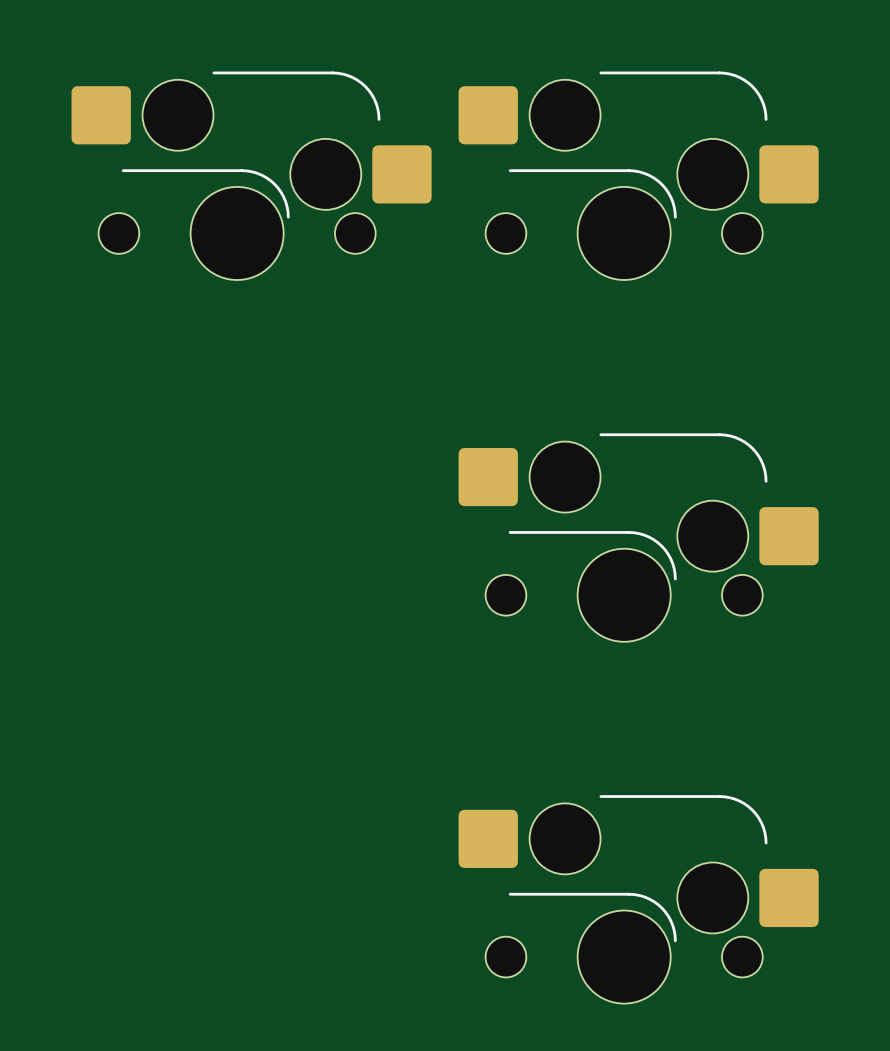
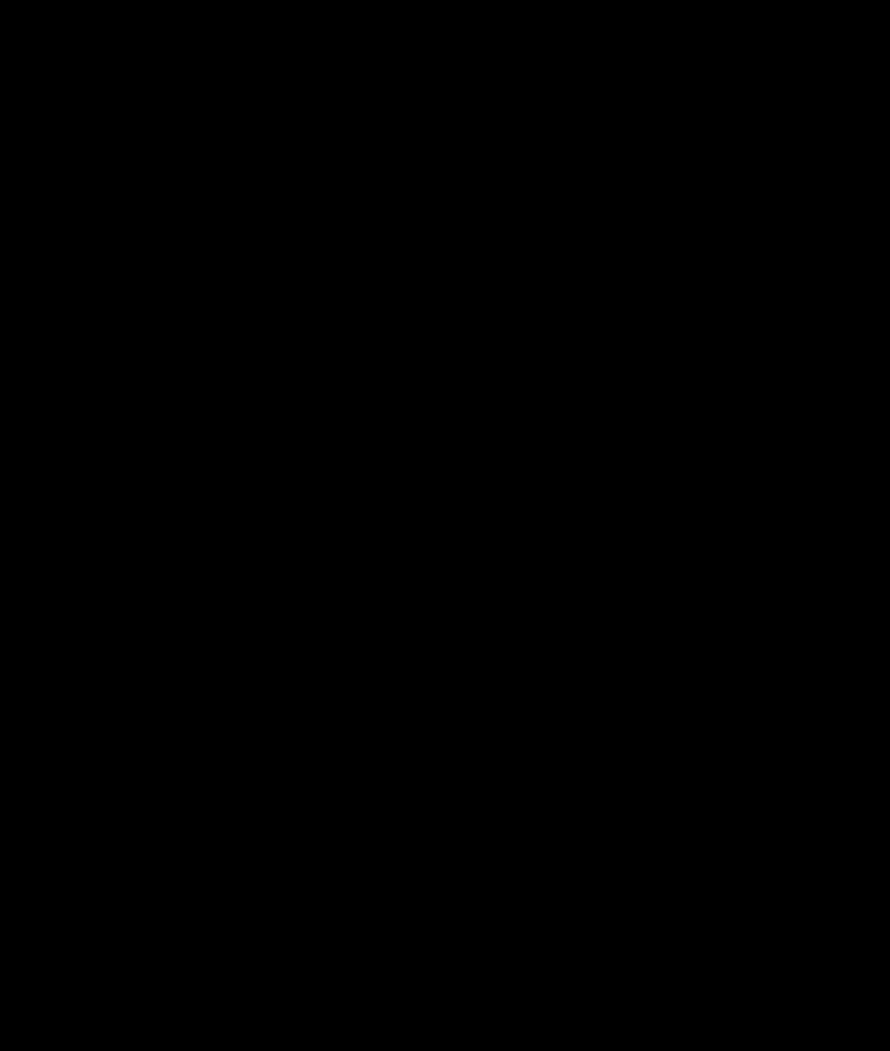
part: (251, 175) -> none
part: (638, 175) -> none
part: (638, 537) -> none
part: (638, 899) -> none

